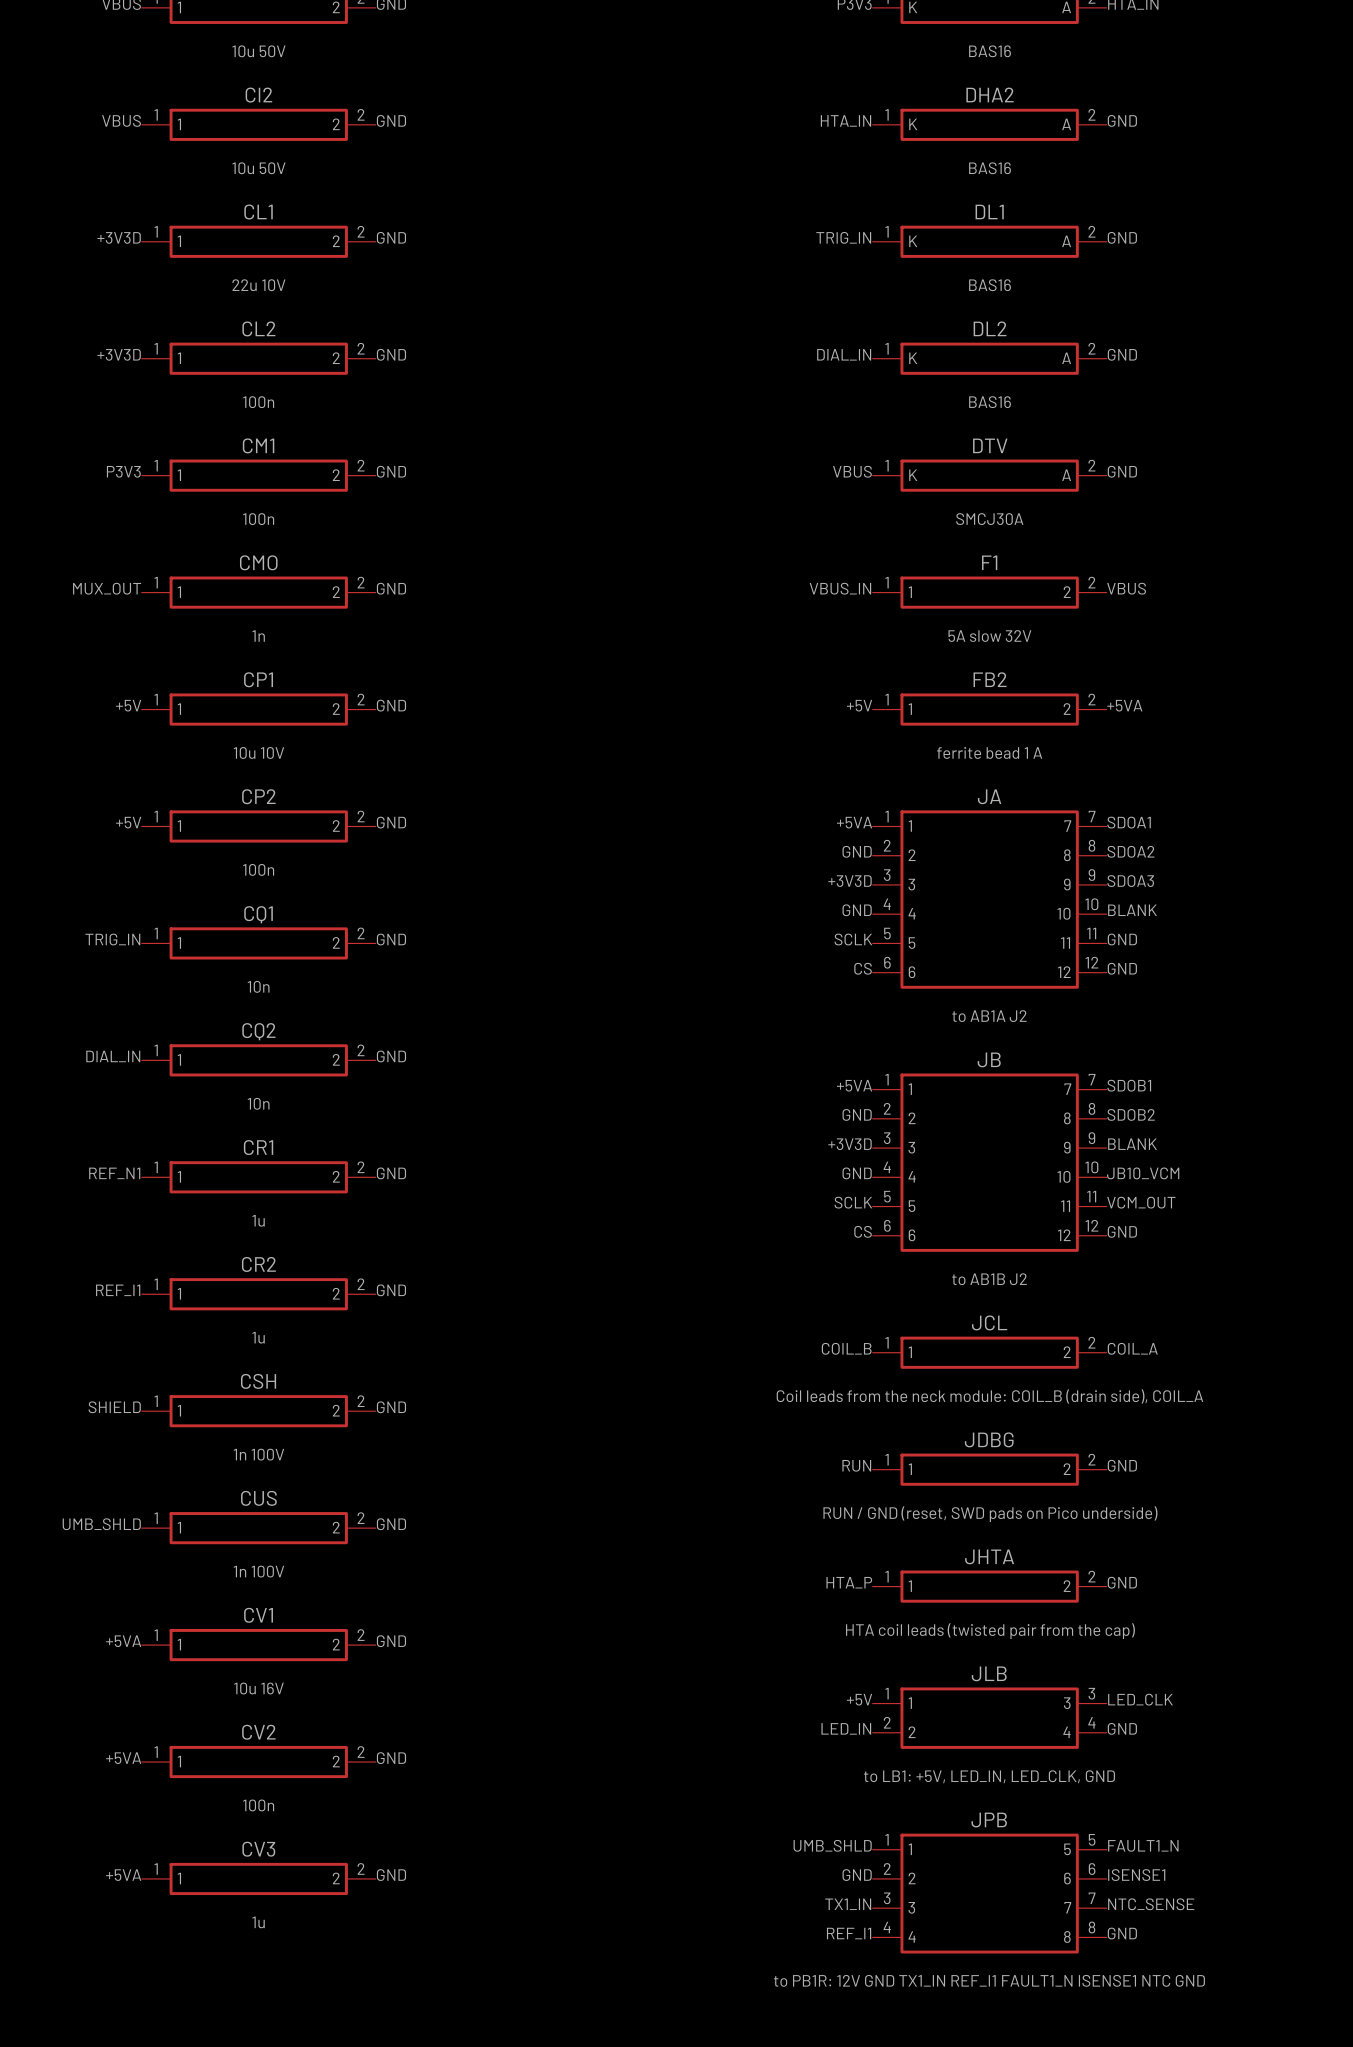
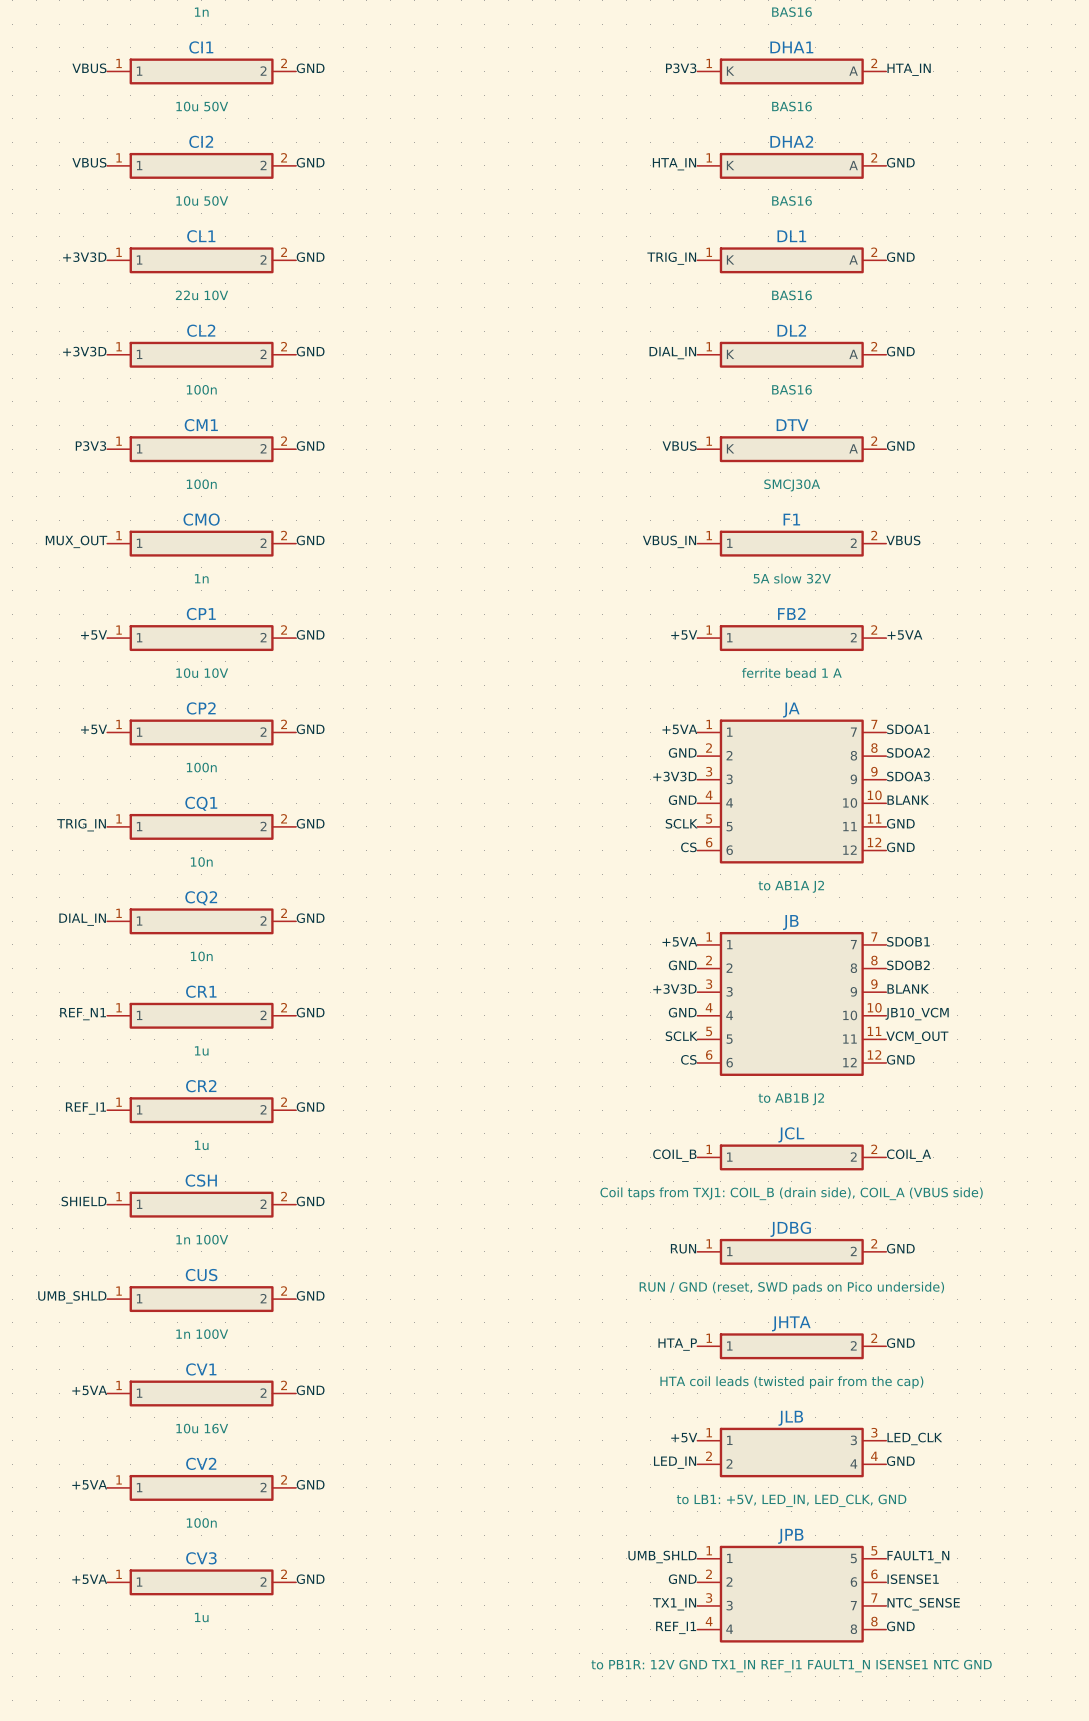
JCL value: Coil leads from the neck module: COIL_B (drain side), COIL_A (989, 1396) -> Coil taps from TXJ1: COIL_B (drain side), COIL_A (VBUS side) (791, 1193)

